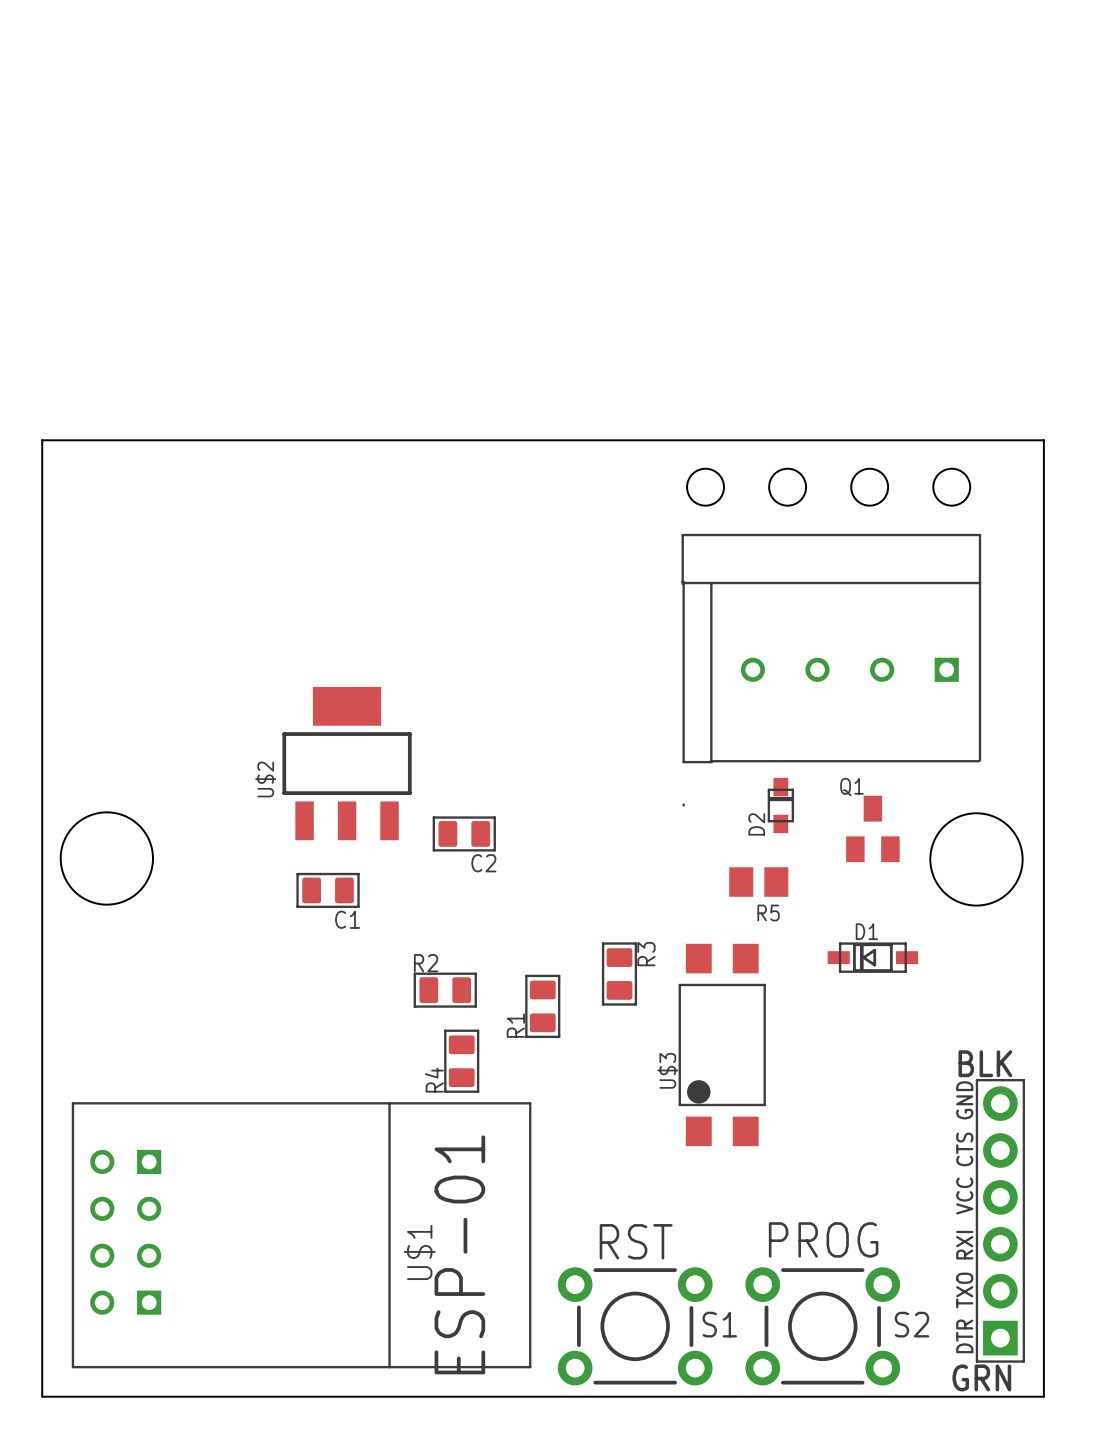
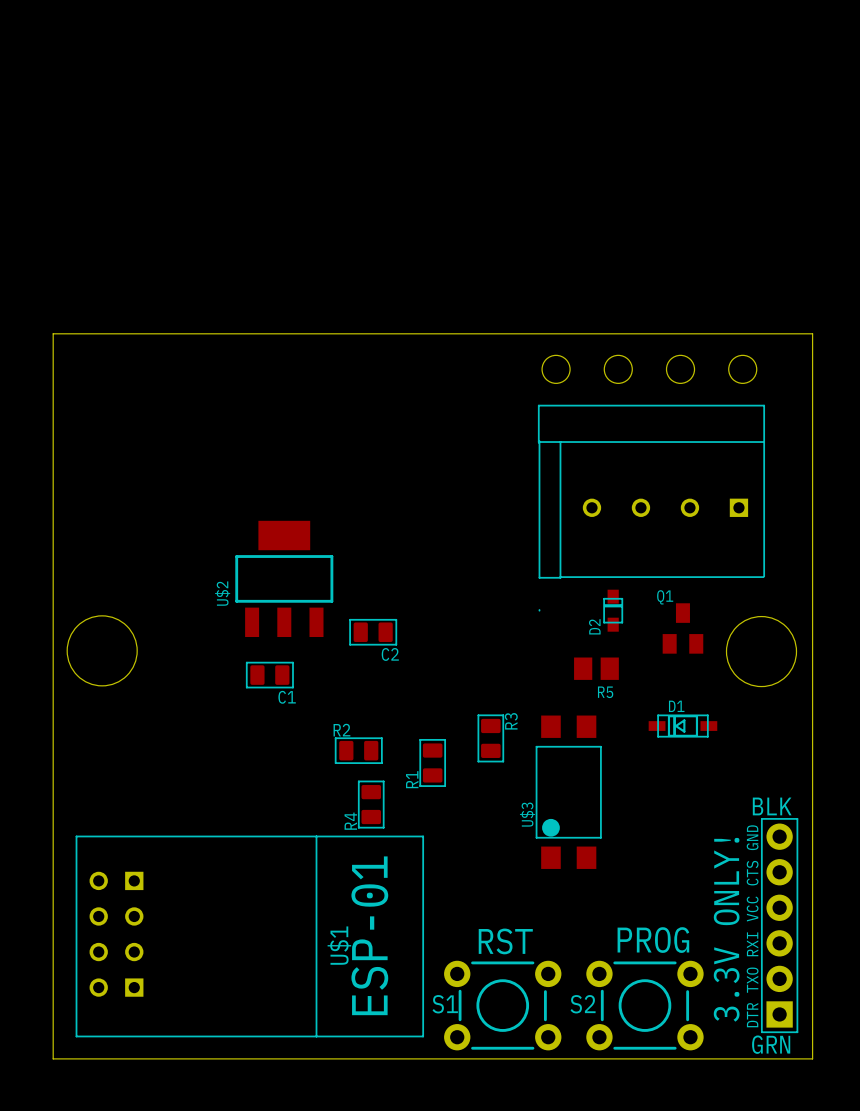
text: none -> 3.3V ONLY! (726, 929)
S1 name position: S1 (719, 1324) -> S1 (445, 1004)
S2 name position: S2 (911, 1324) -> S2 (583, 1004)

